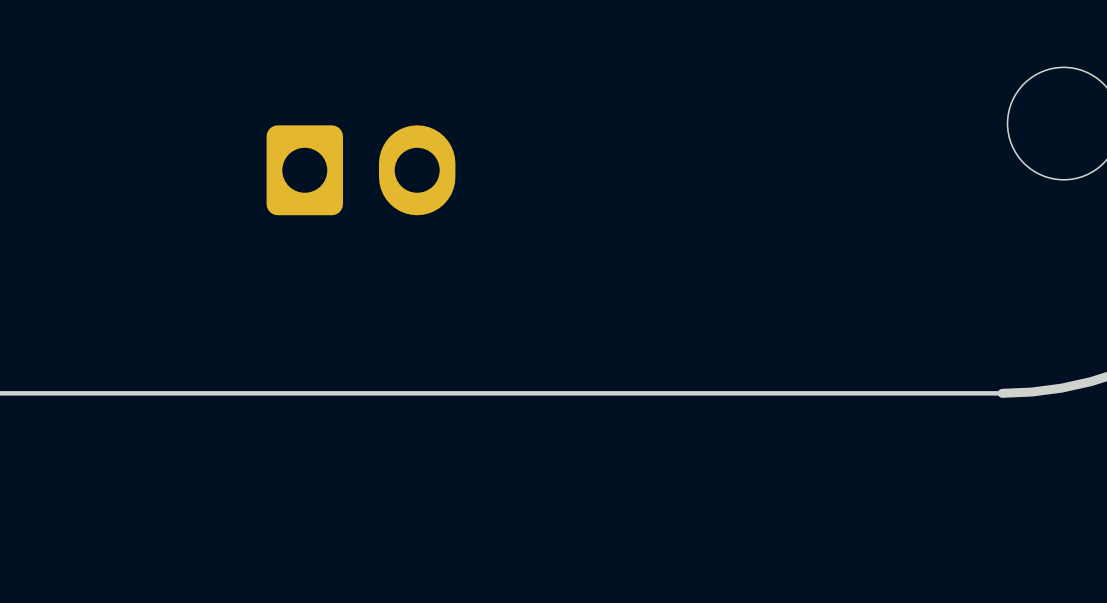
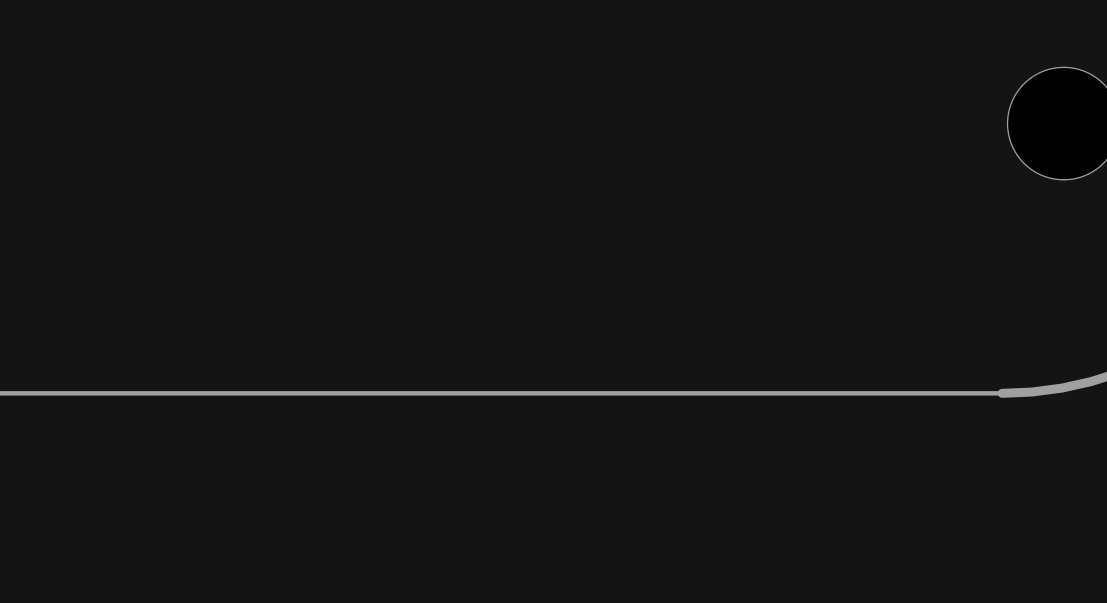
part: (361, 170) -> none

